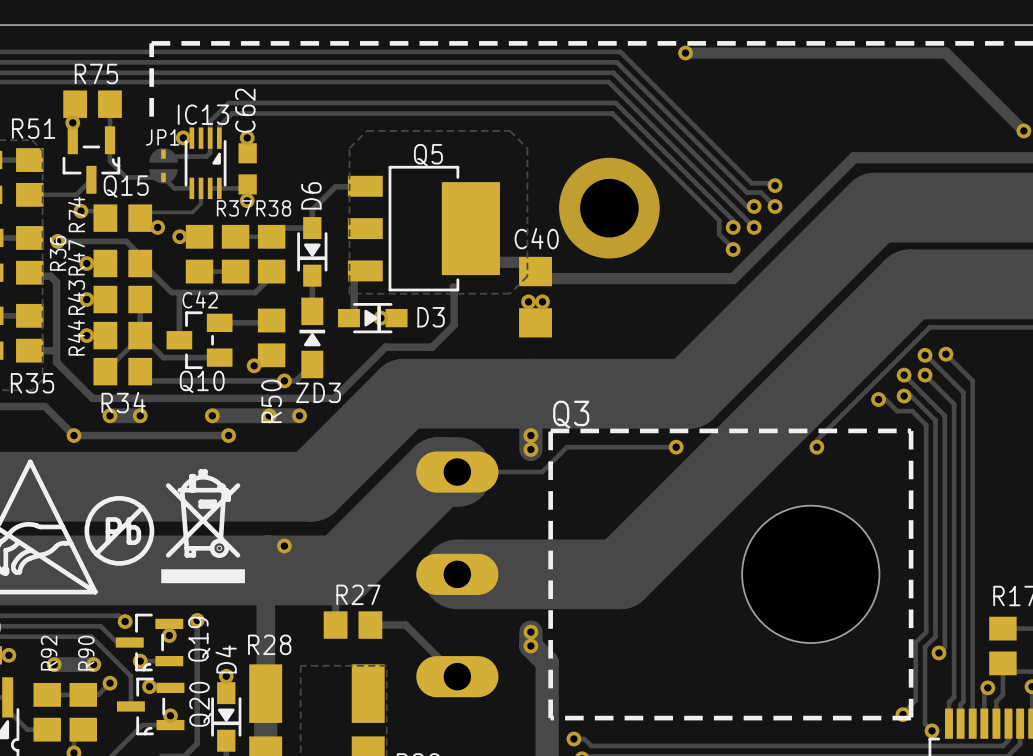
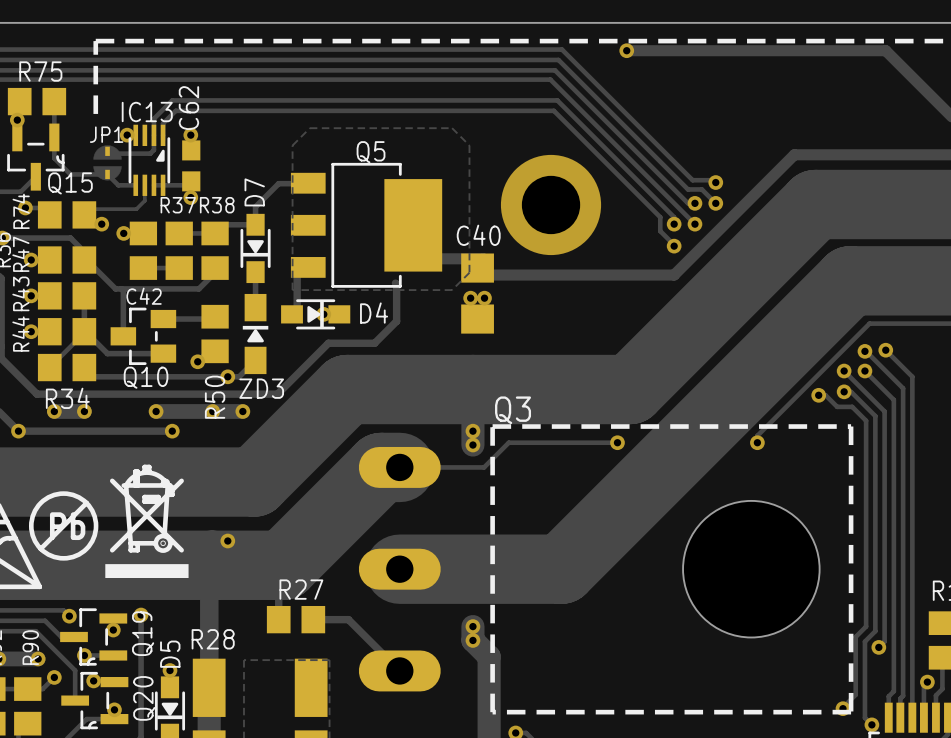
D6 name: D6 (311, 195) -> D7 (254, 192)
D3 name: D3 (431, 317) -> D4 (374, 313)
D4 name: D4 (226, 659) -> D5 (170, 654)

